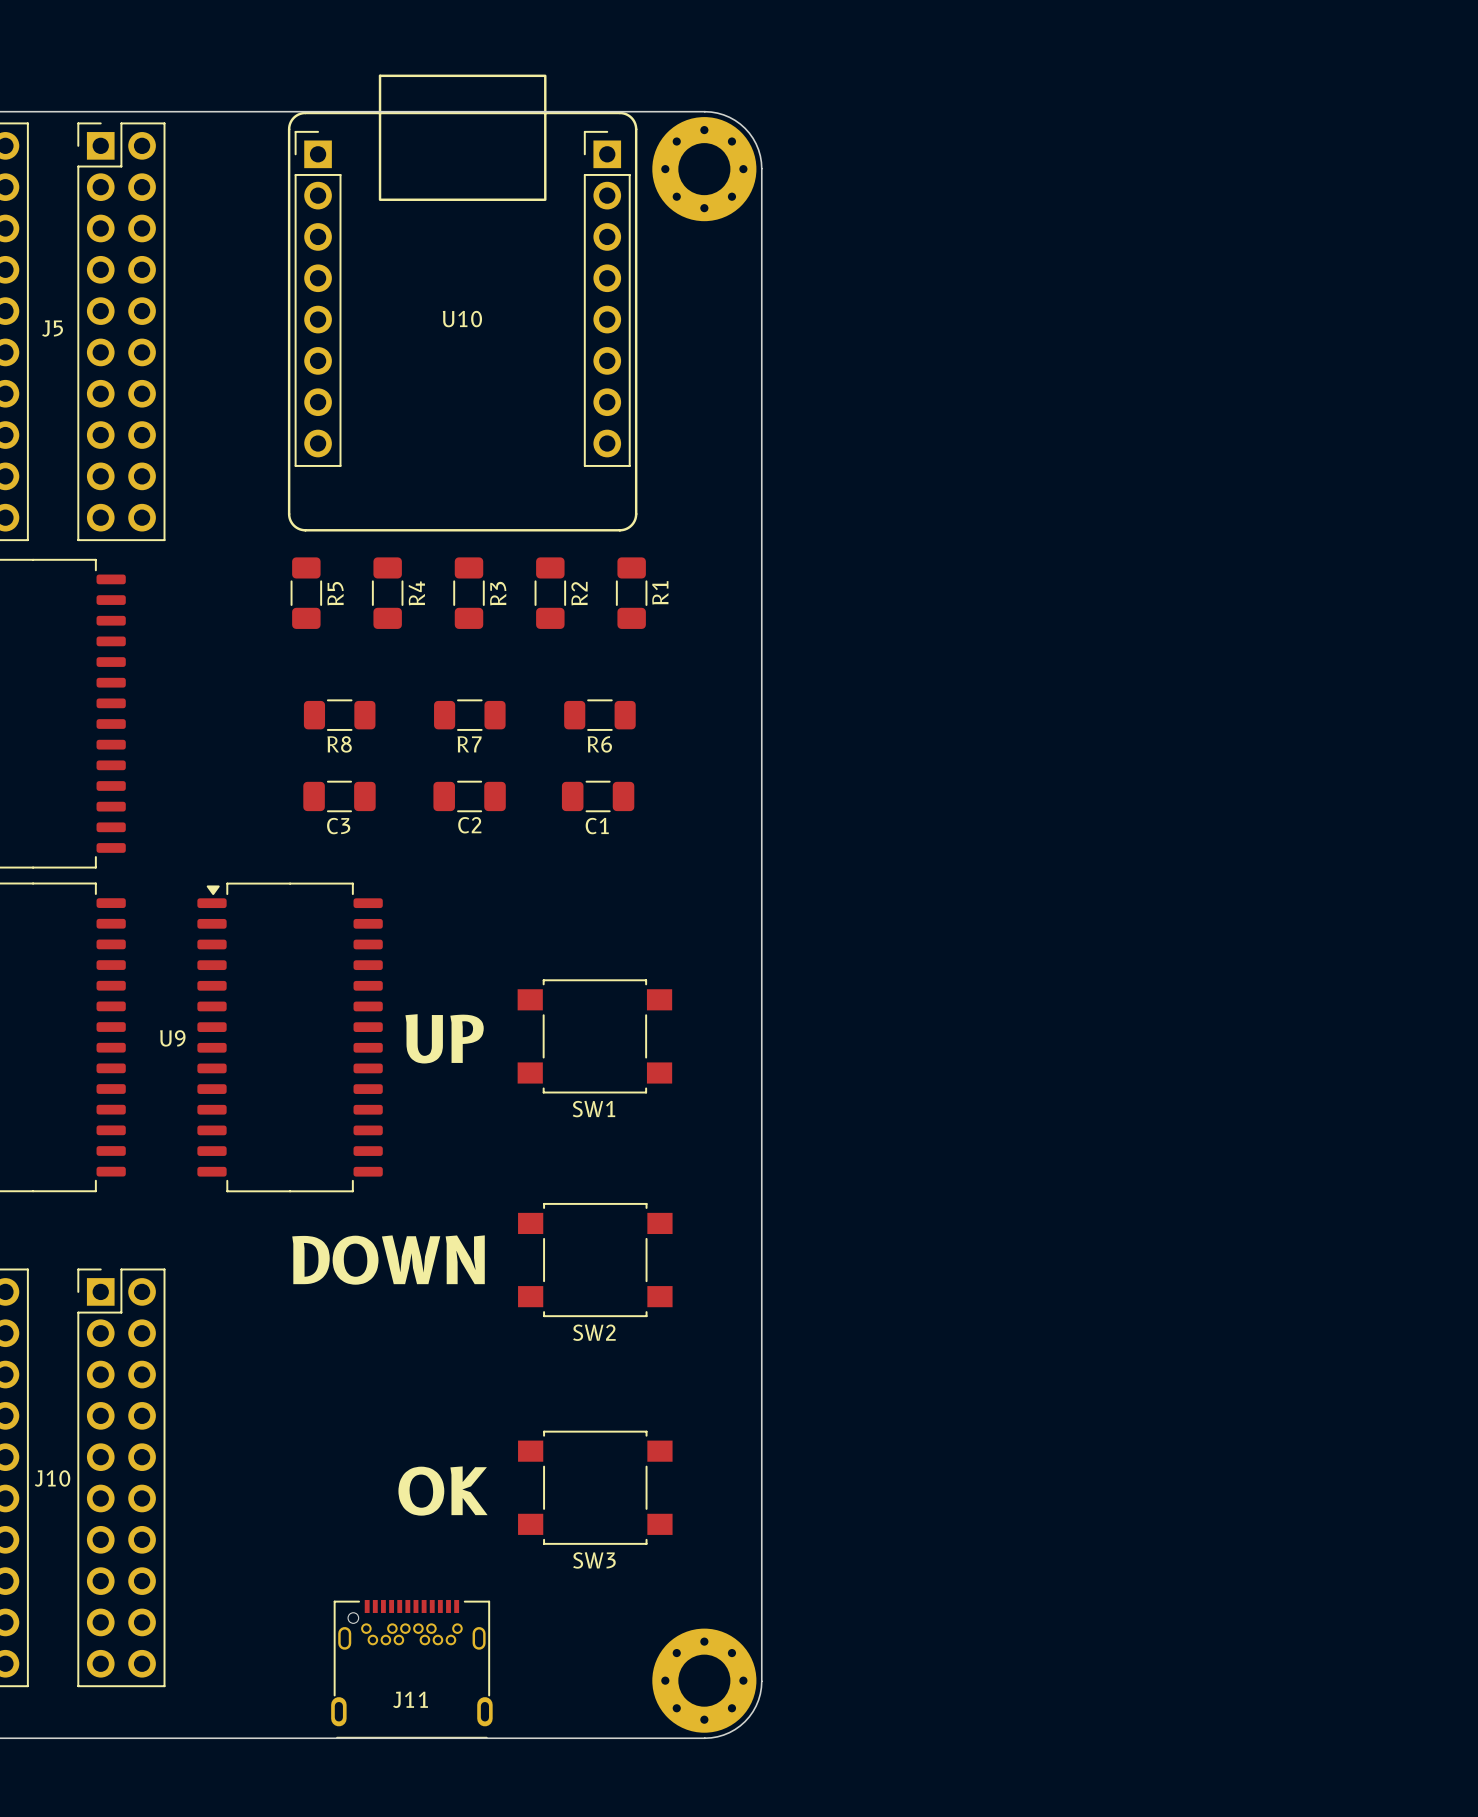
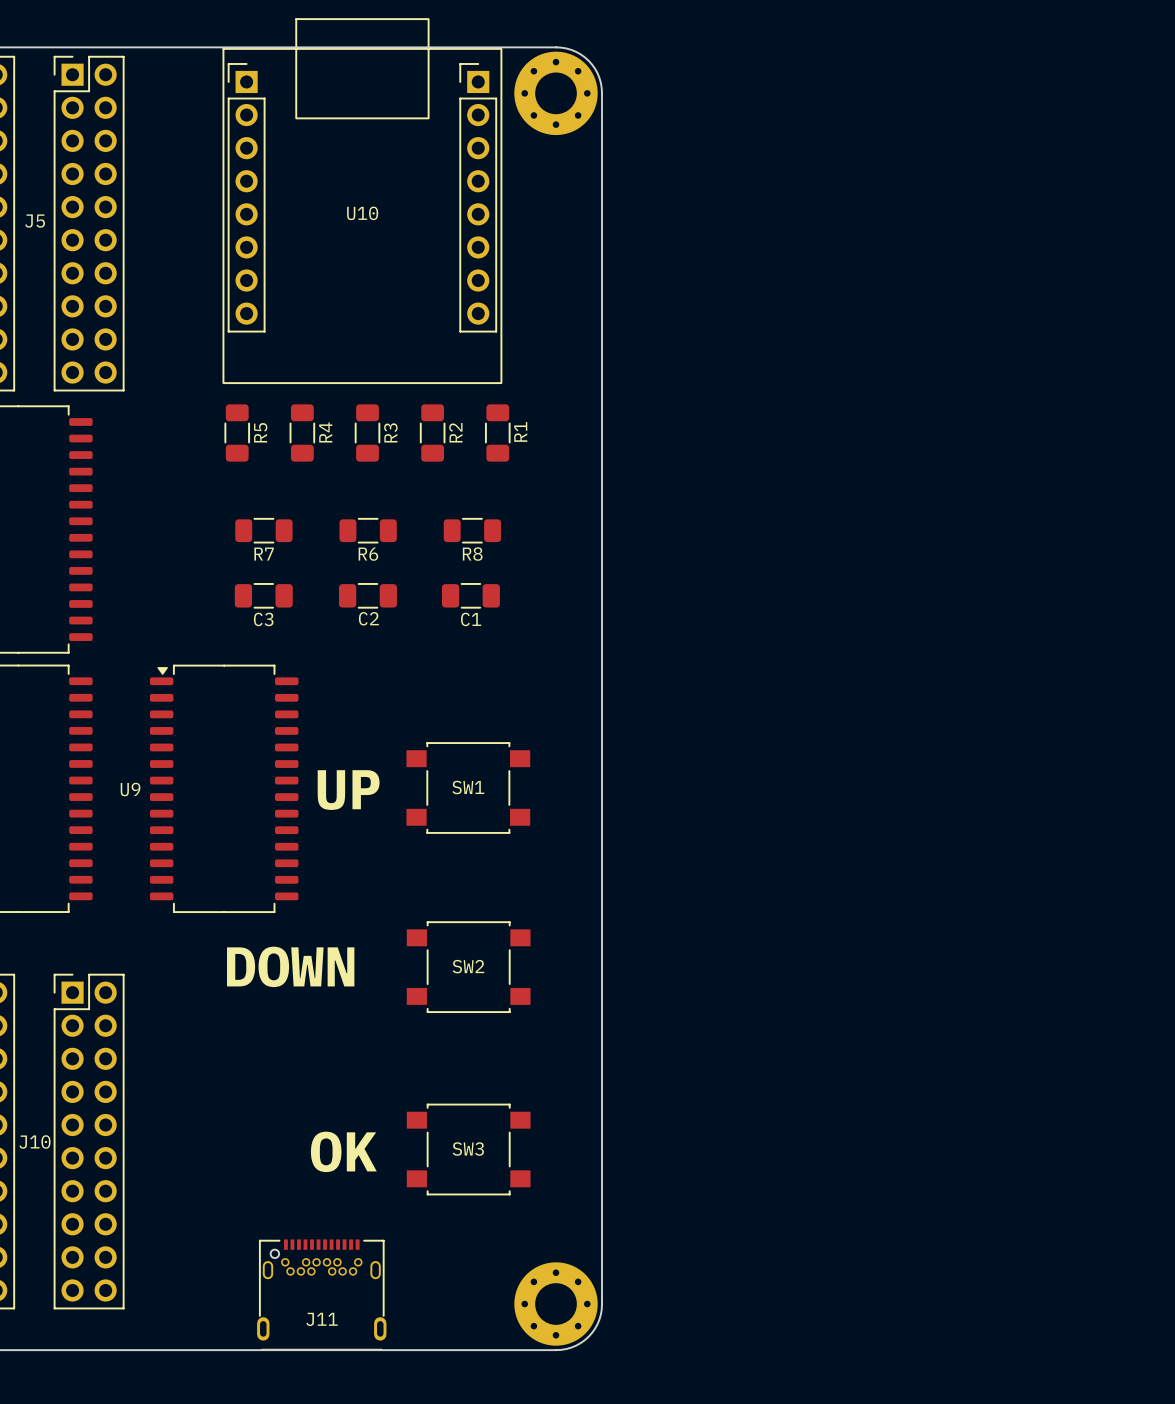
U10 footprint: [287, 74, 638, 532] -> [222, 18, 503, 384]
R8 name: R8 (339, 744) -> R7 (264, 554)
R7 name: R7 (469, 744) -> R6 (368, 554)
R6 name: R6 (599, 744) -> R8 (472, 554)
SW1 name position: SW1 (593, 1109) -> SW1 (468, 787)
SW2 name position: SW2 (594, 1332) -> SW2 (468, 966)
SW3 name position: SW3 (594, 1560) -> SW3 (468, 1149)

